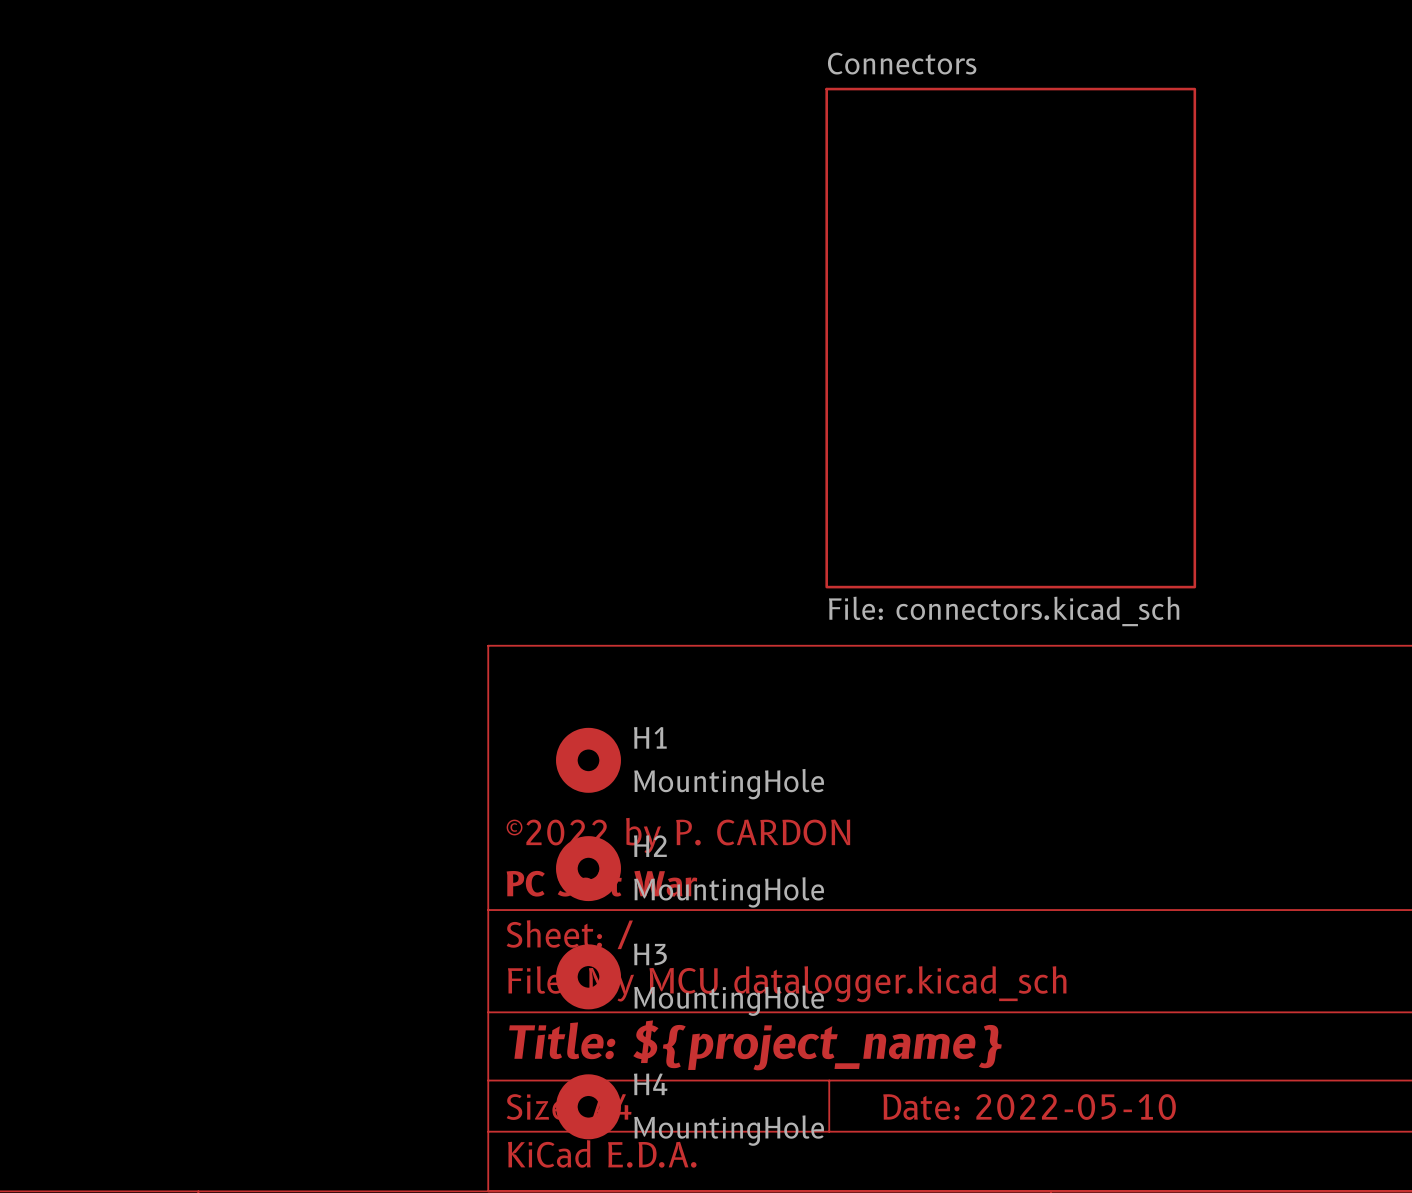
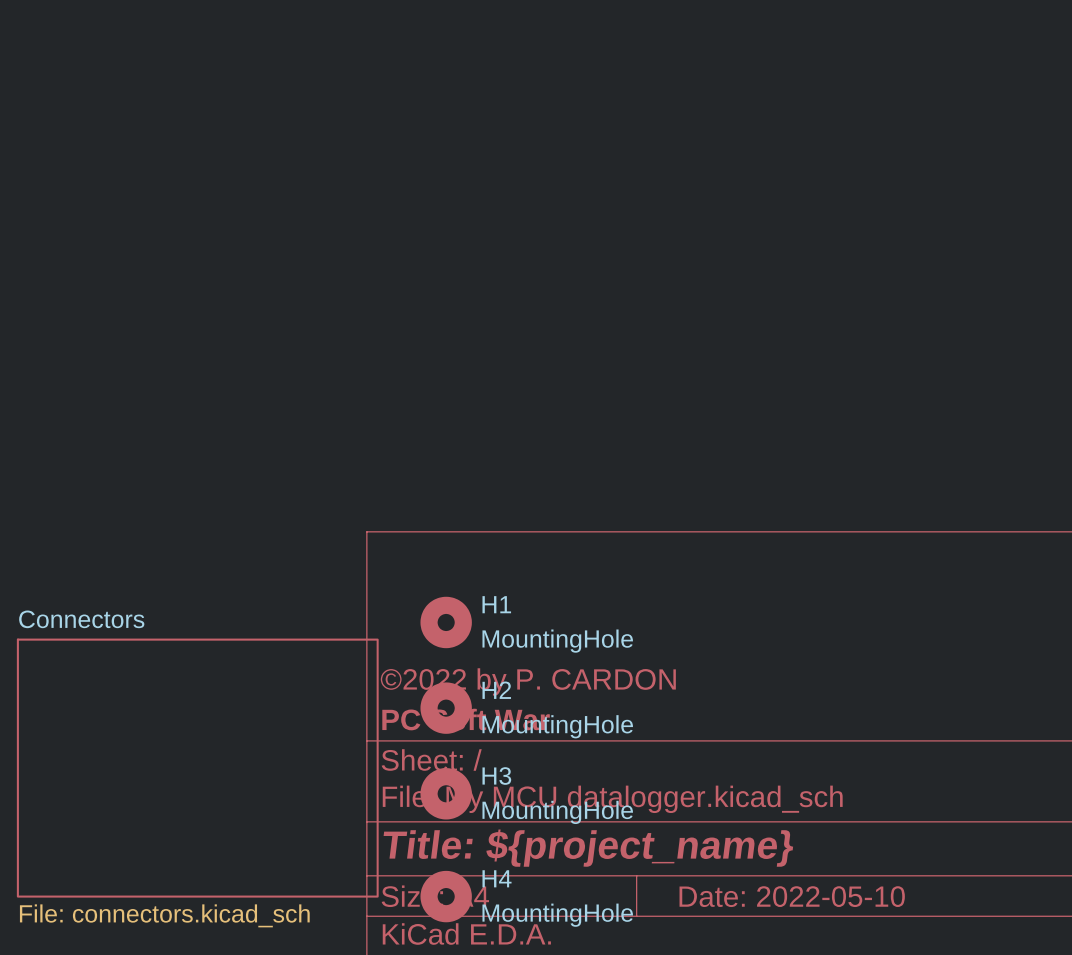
sheet Connectors: File: connectors.kicad_sch (1010, 338) -> none
sheet Connectors: none -> File: connectors.kicad_sch (197, 768)

